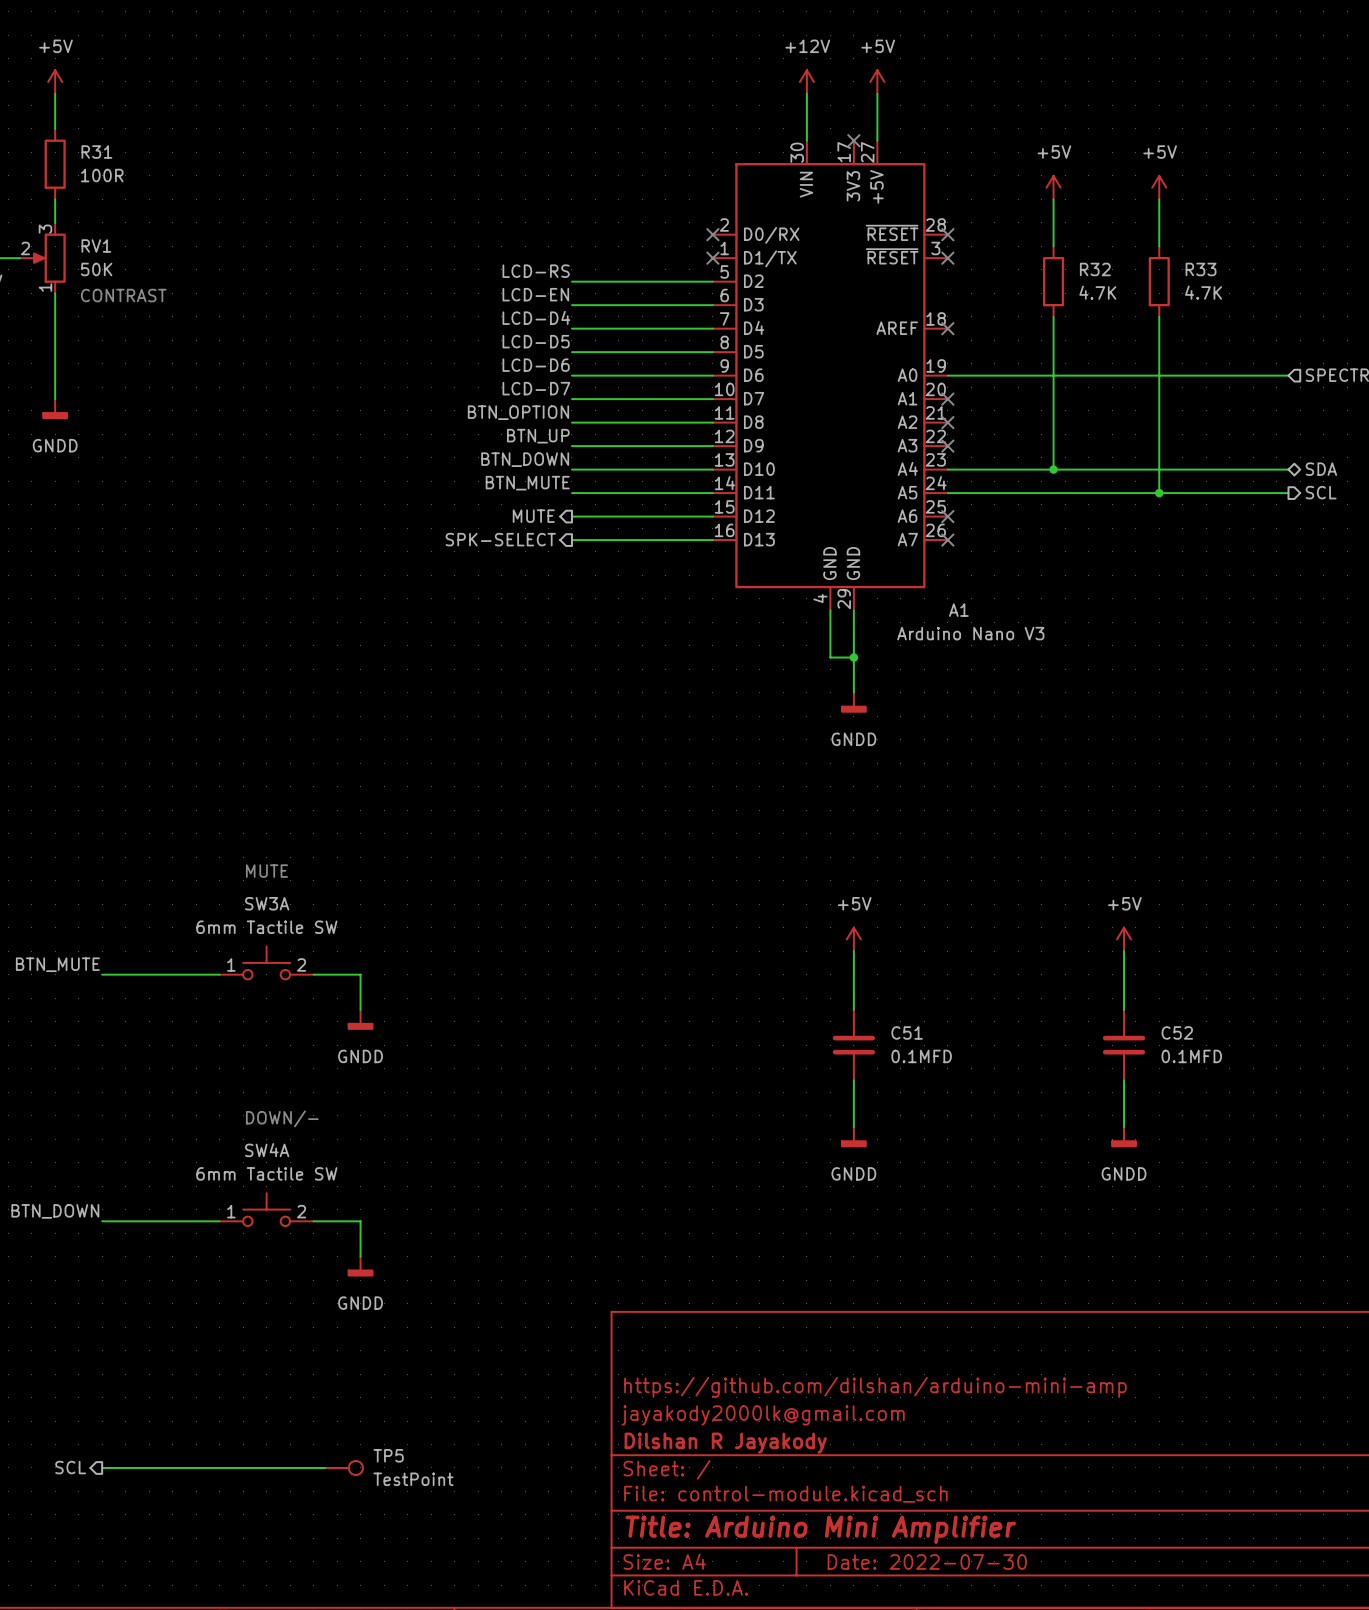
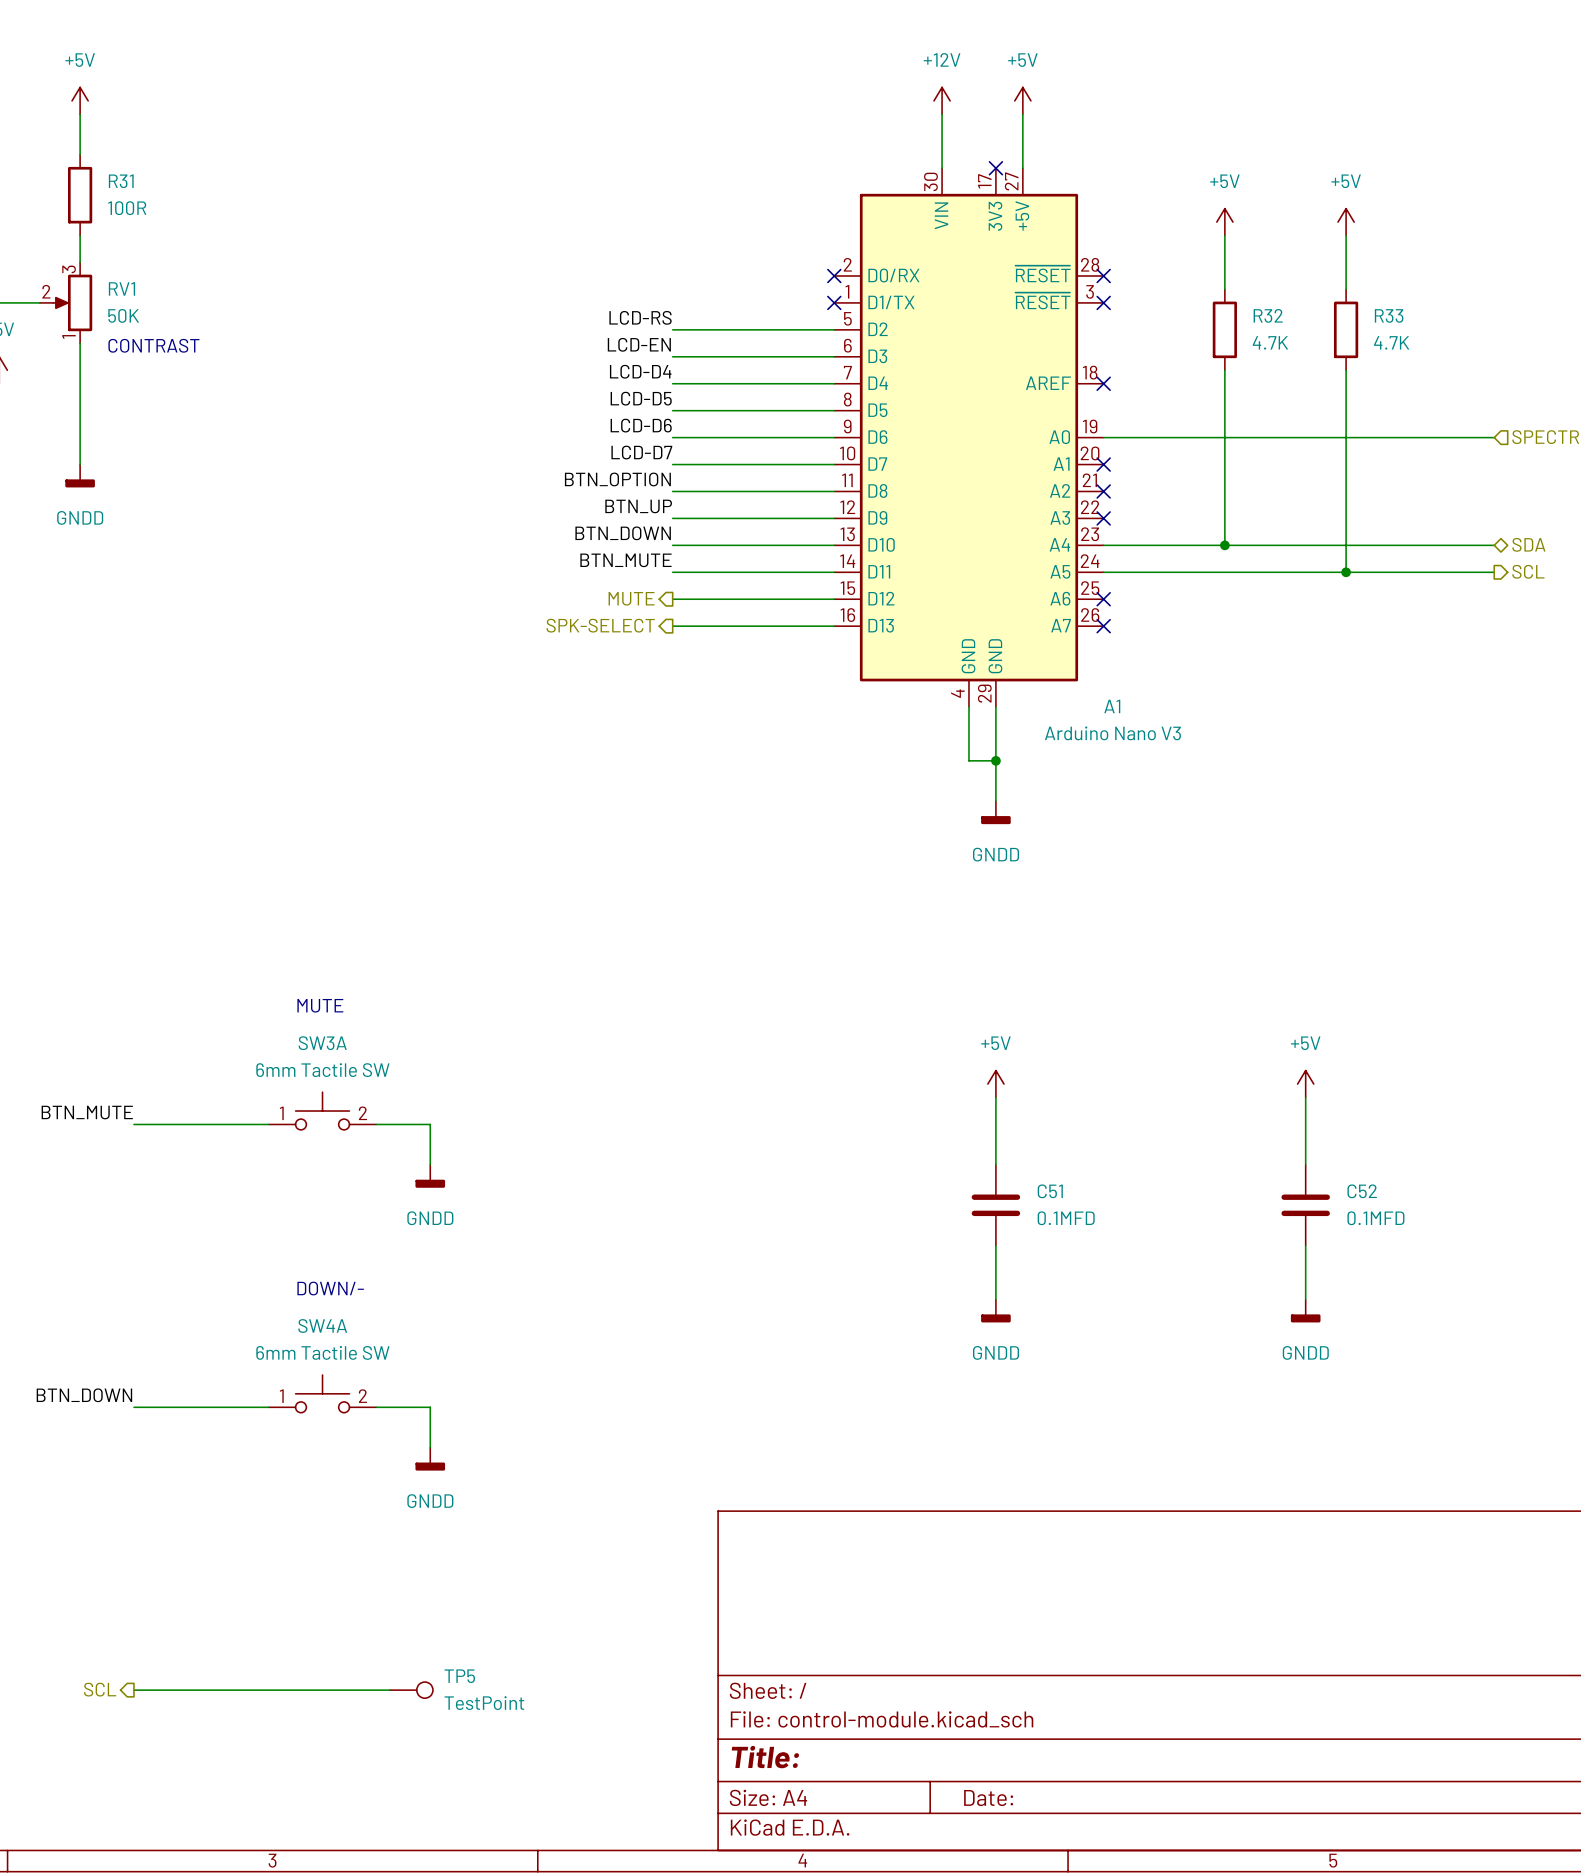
title block: https://github.com/dilshan/arduino-mini-amp (875, 1387) -> none
title block: jayakody2000lk@gmail.com (763, 1415) -> none
title block: Dilshan R Jayakody (725, 1443) -> none
title block: Title: Arduino Mini Amplifier (820, 1529) -> Title: (765, 1757)
title block: Date: 2022-07-30 (927, 1561) -> Date: (988, 1798)

